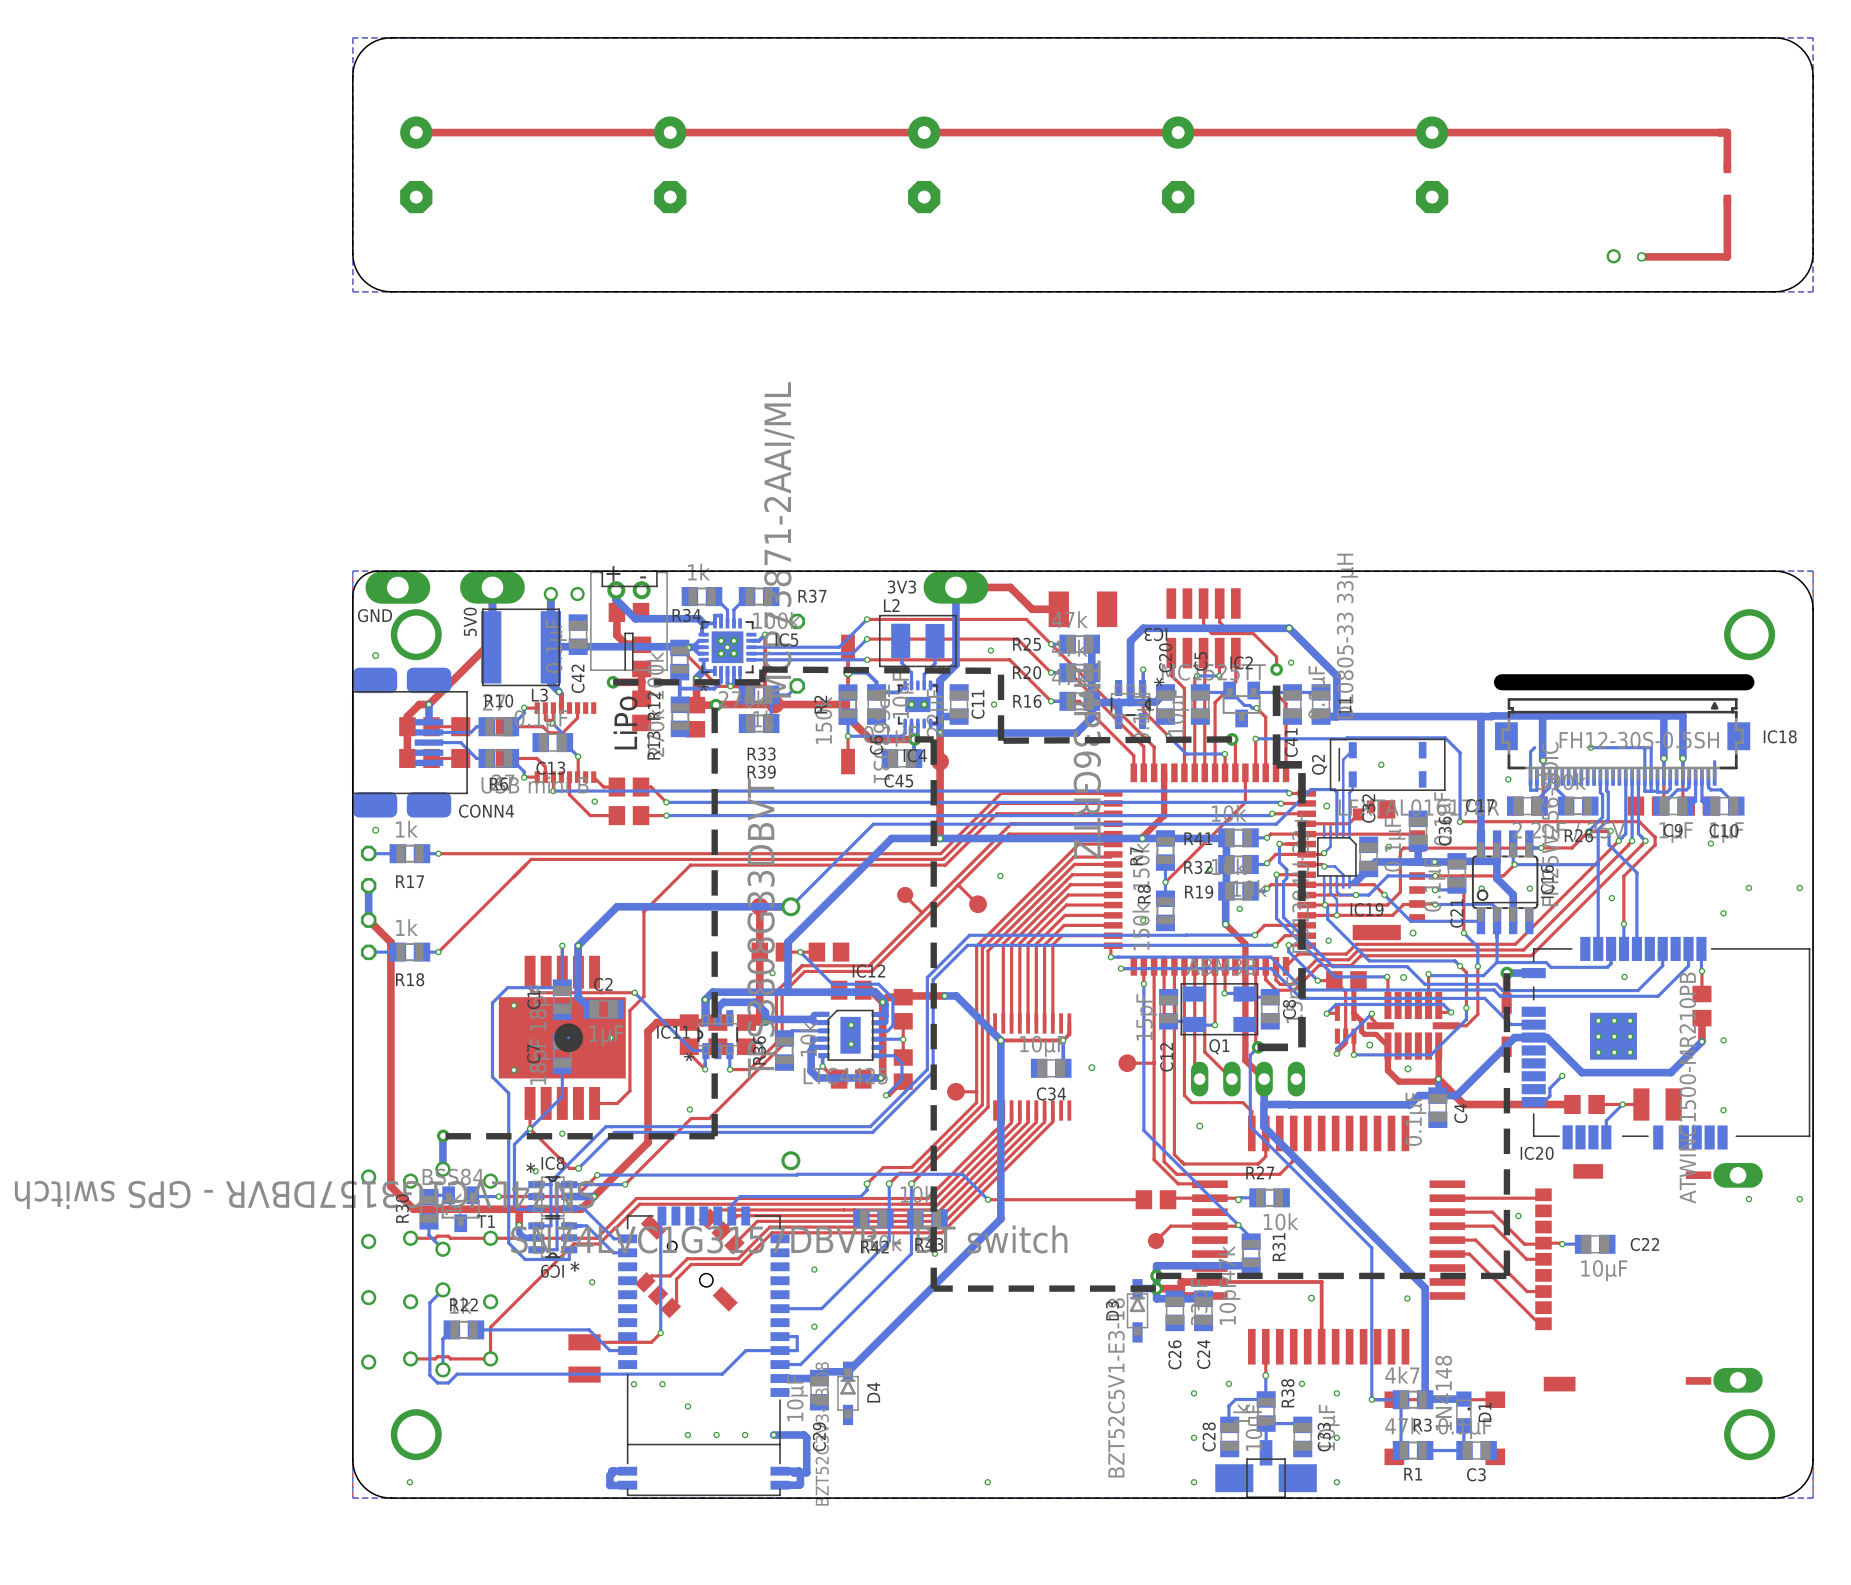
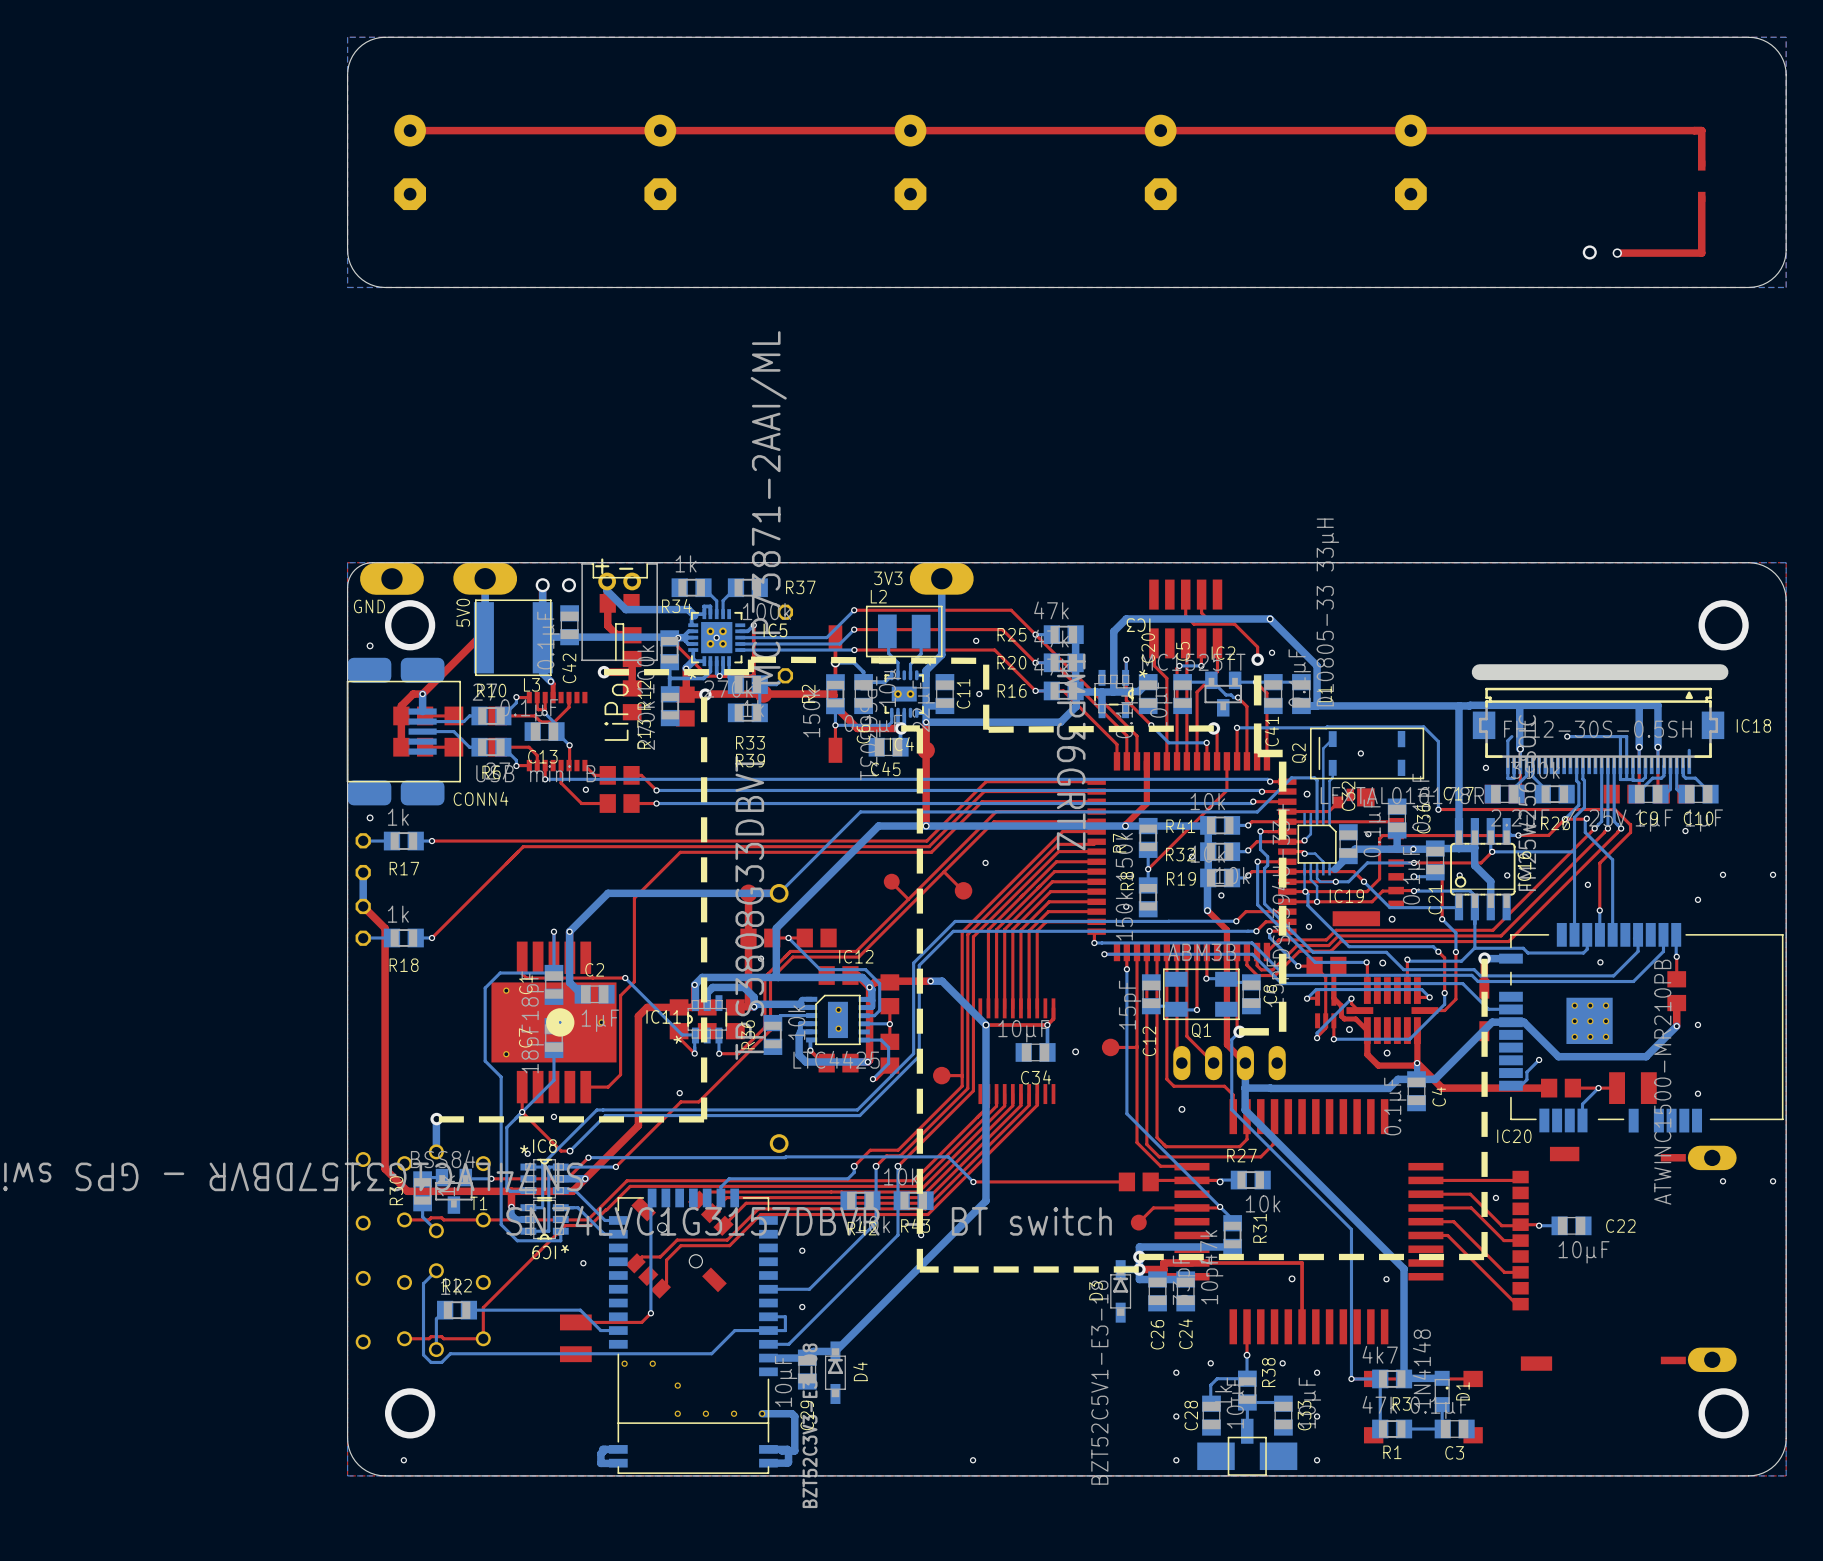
top track: (955, 587) (1010, 587) (1032, 609) (1058, 609) -> none
part: (1082, 609) -> none

